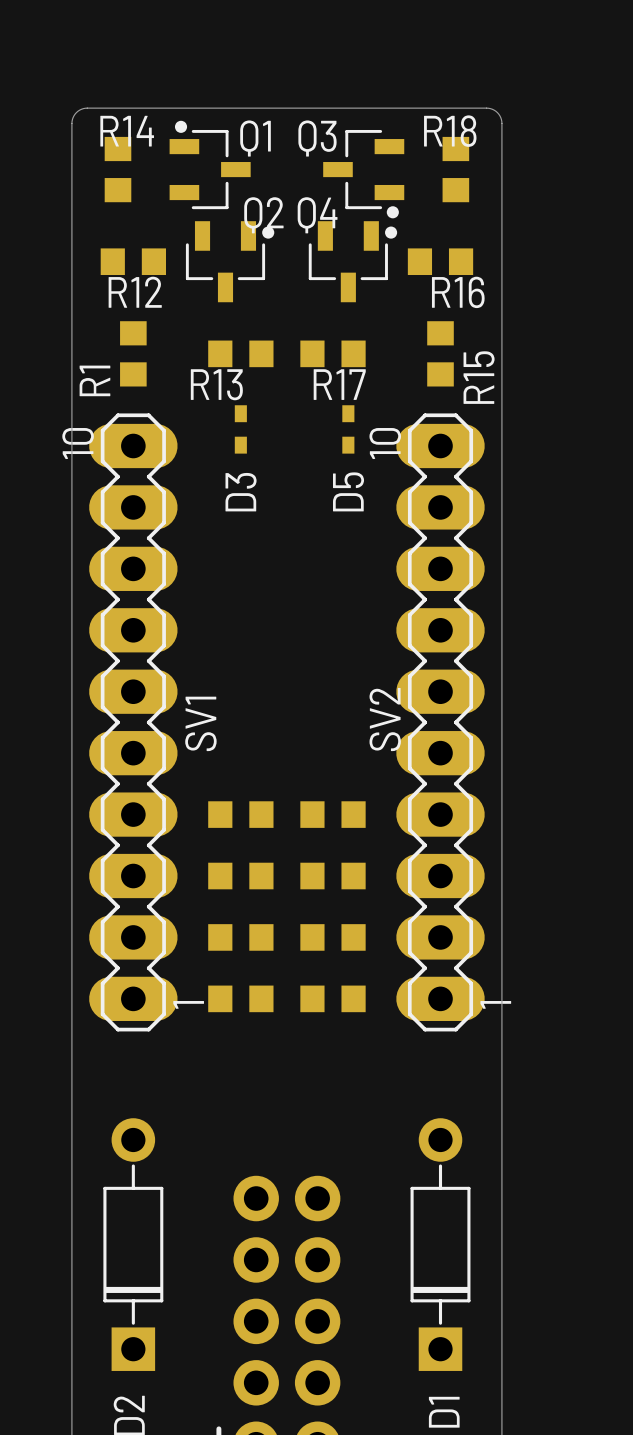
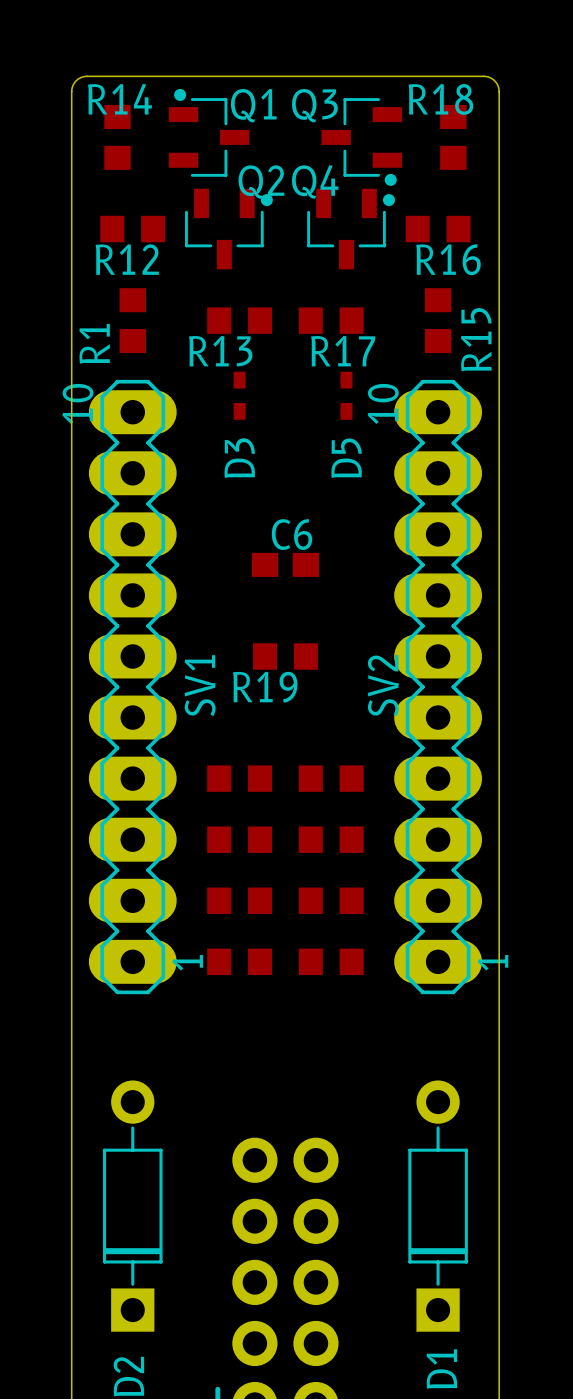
C6: none -> (285, 564)
R19: none -> (285, 656)

